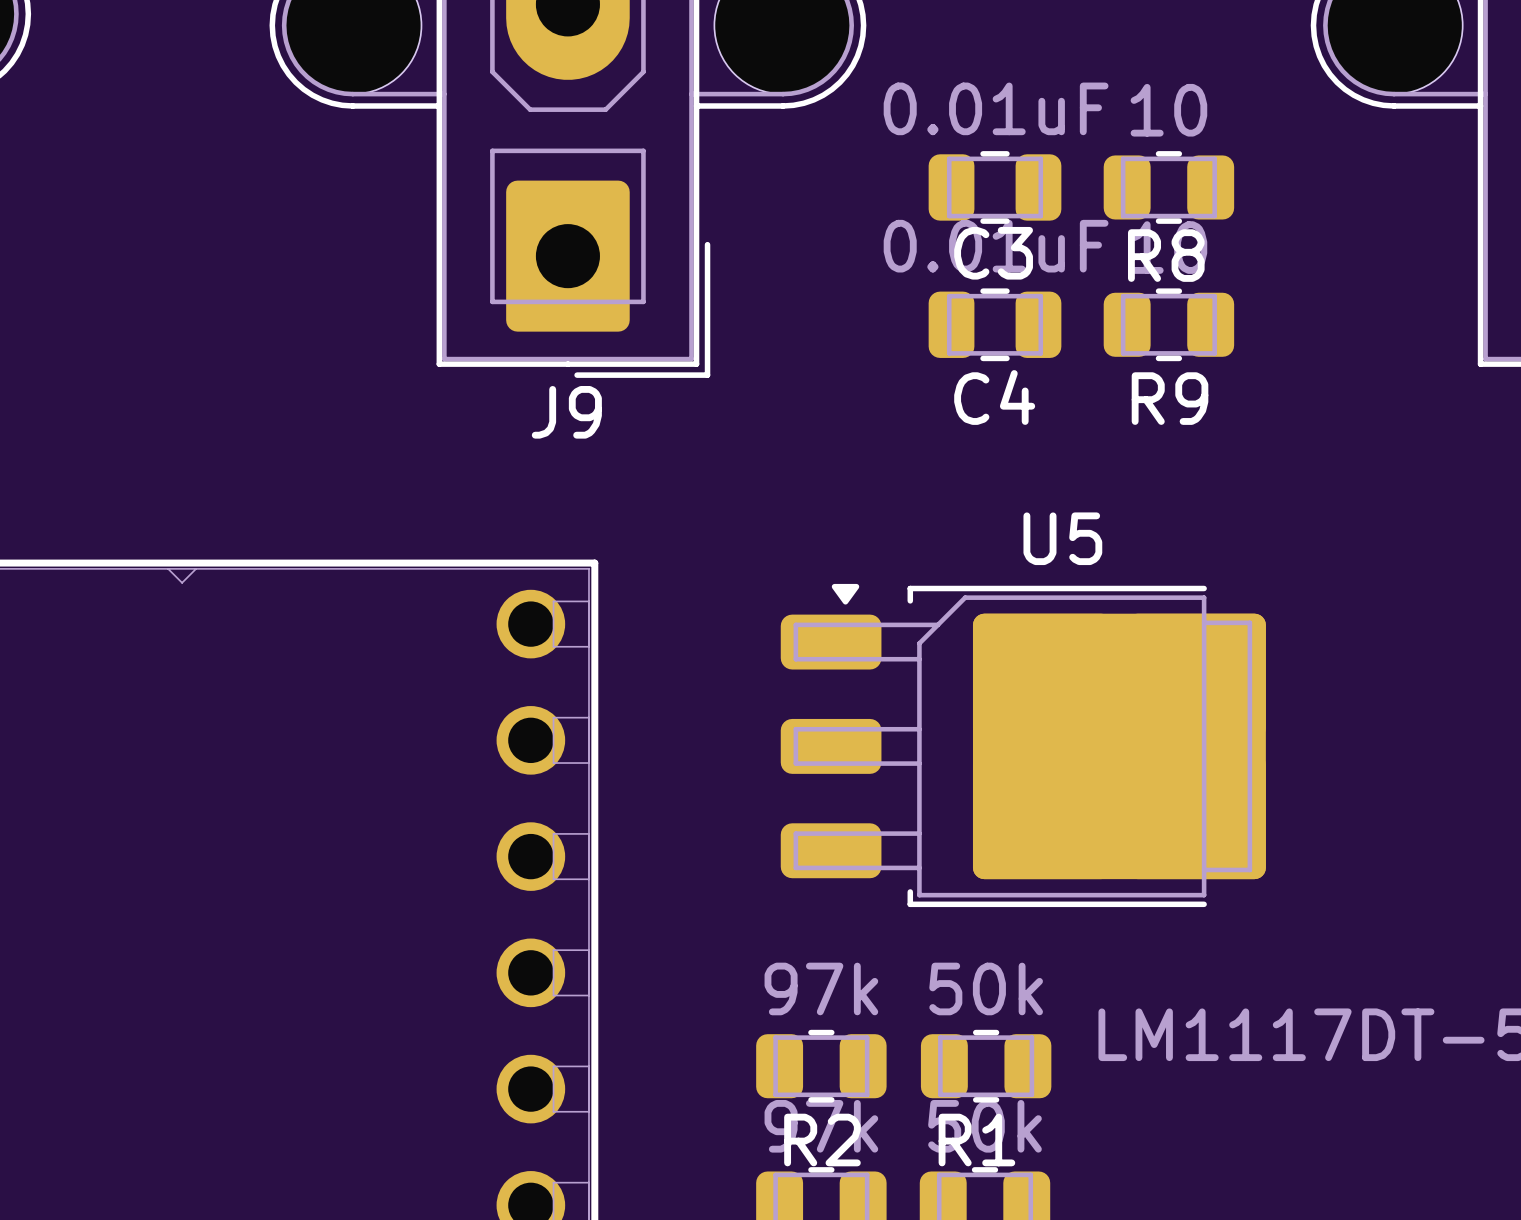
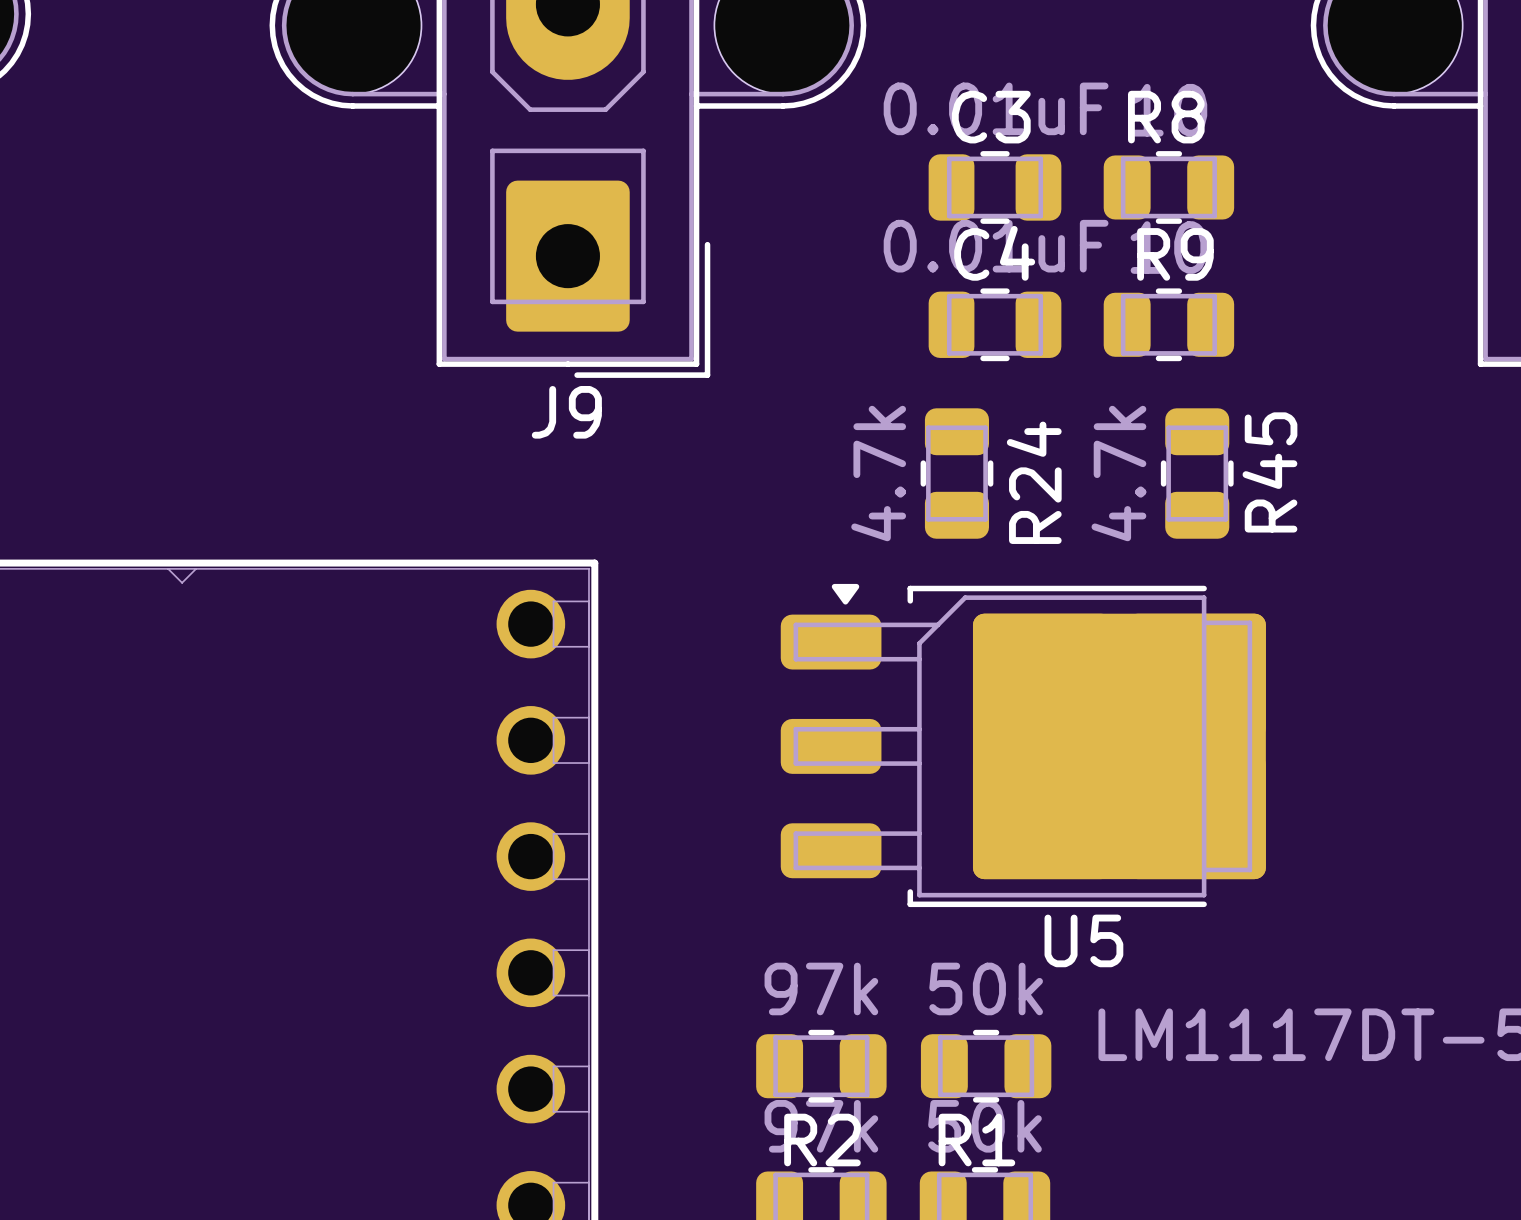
C3 name position: C3 (993, 253) -> C3 (991, 117)
R8 name position: R8 (1166, 255) -> R8 (1166, 117)
C4 name position: C4 (994, 397) -> C4 (994, 253)
R9 name position: R9 (1170, 398) -> R9 (1175, 254)
R24: none -> 4.7k (956, 473)
R45: none -> 4.7k (1197, 473)
U5 name position: U5 (1062, 538) -> U5 (1083, 940)

